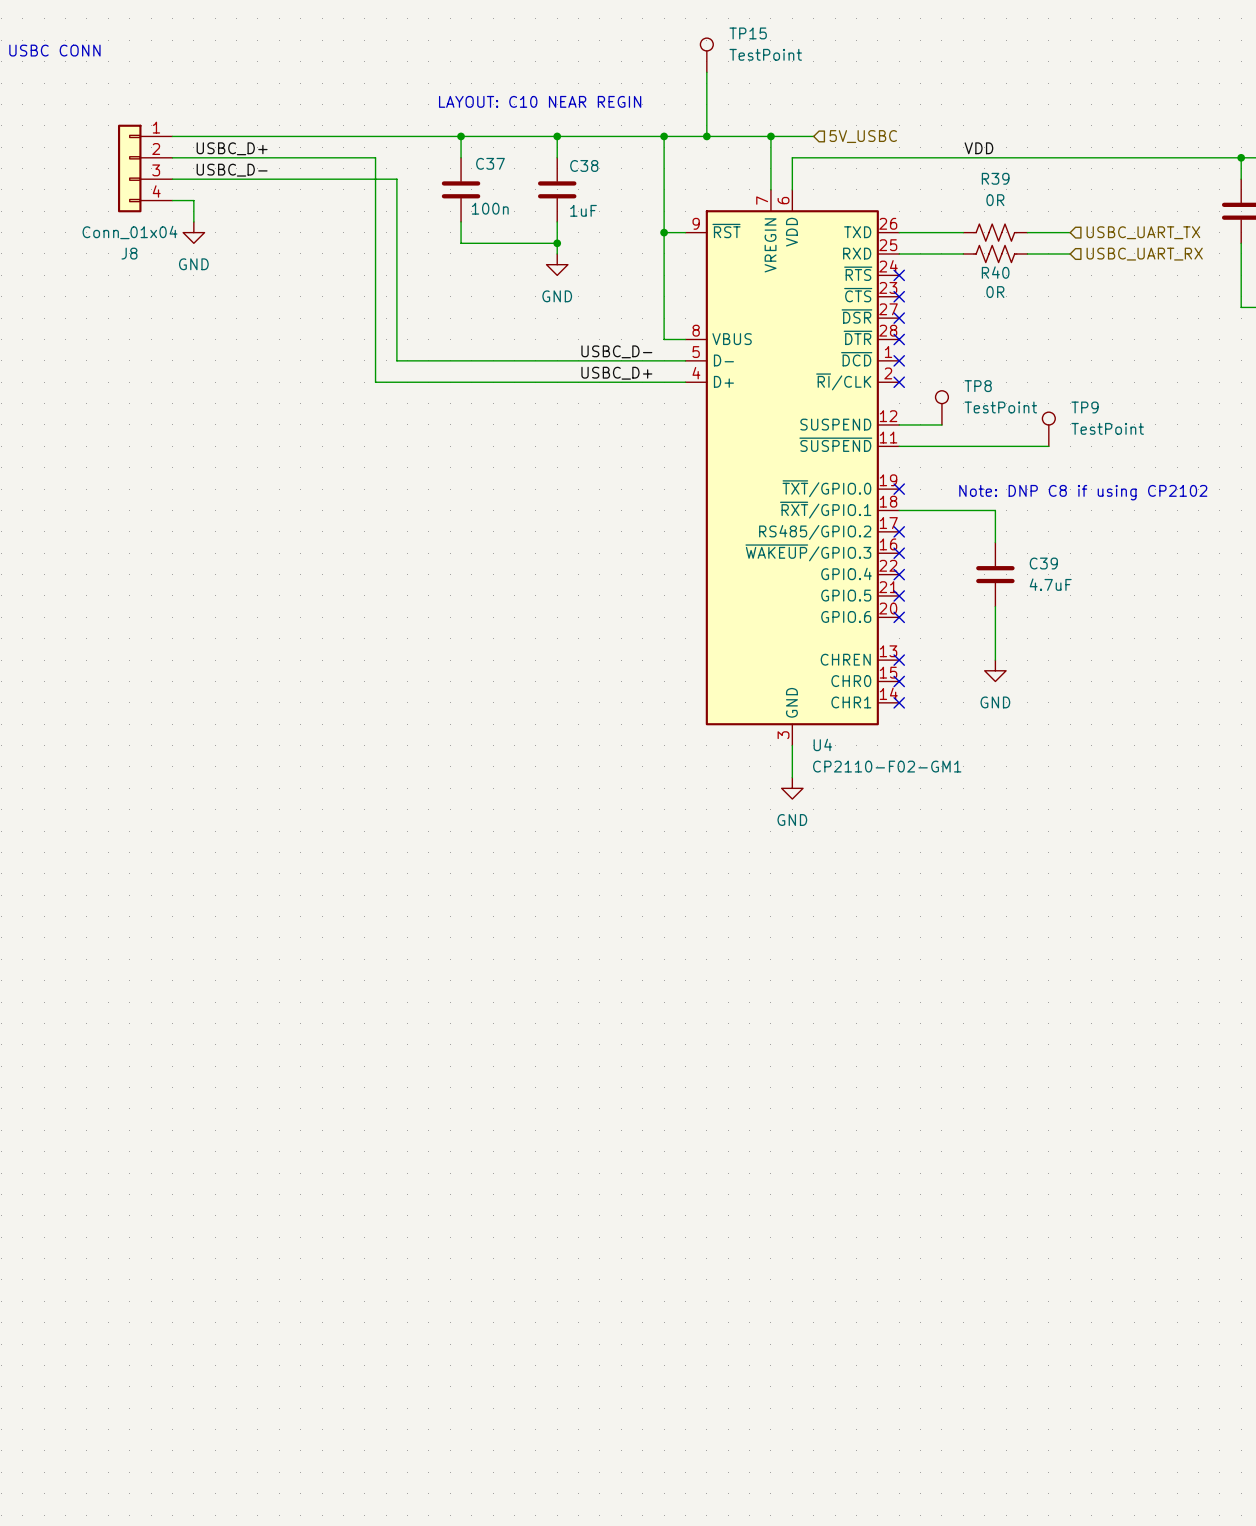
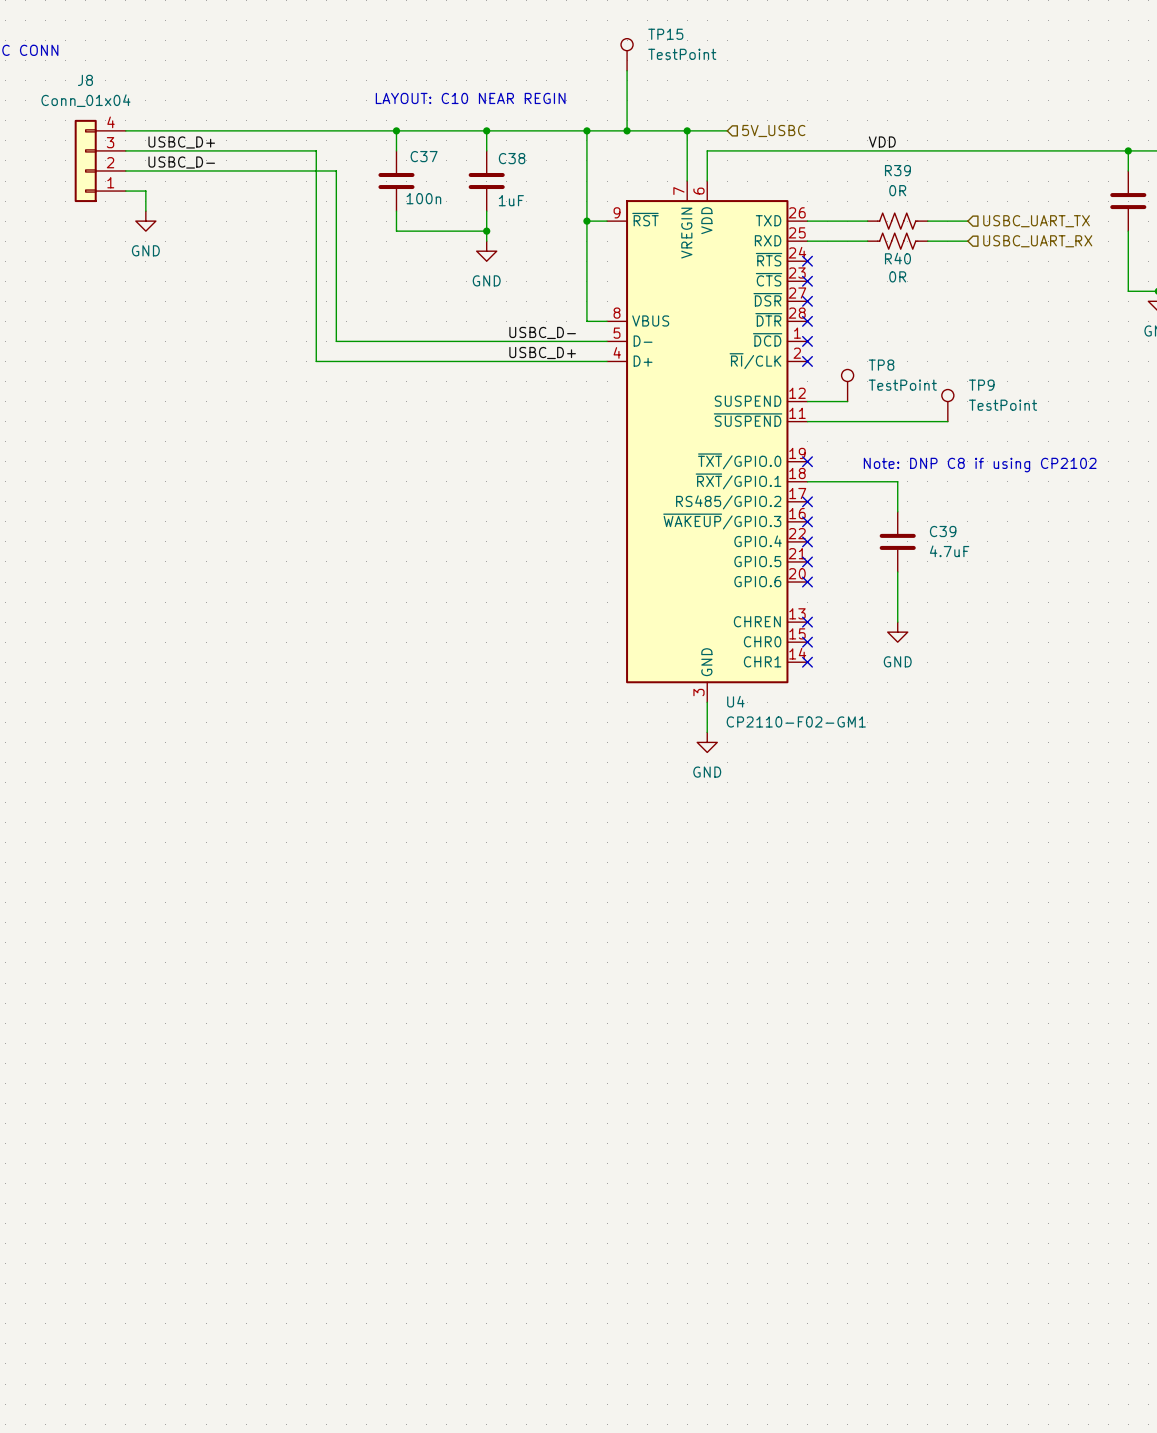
J8 flip: as is (129, 168) -> up-down (85, 160)

